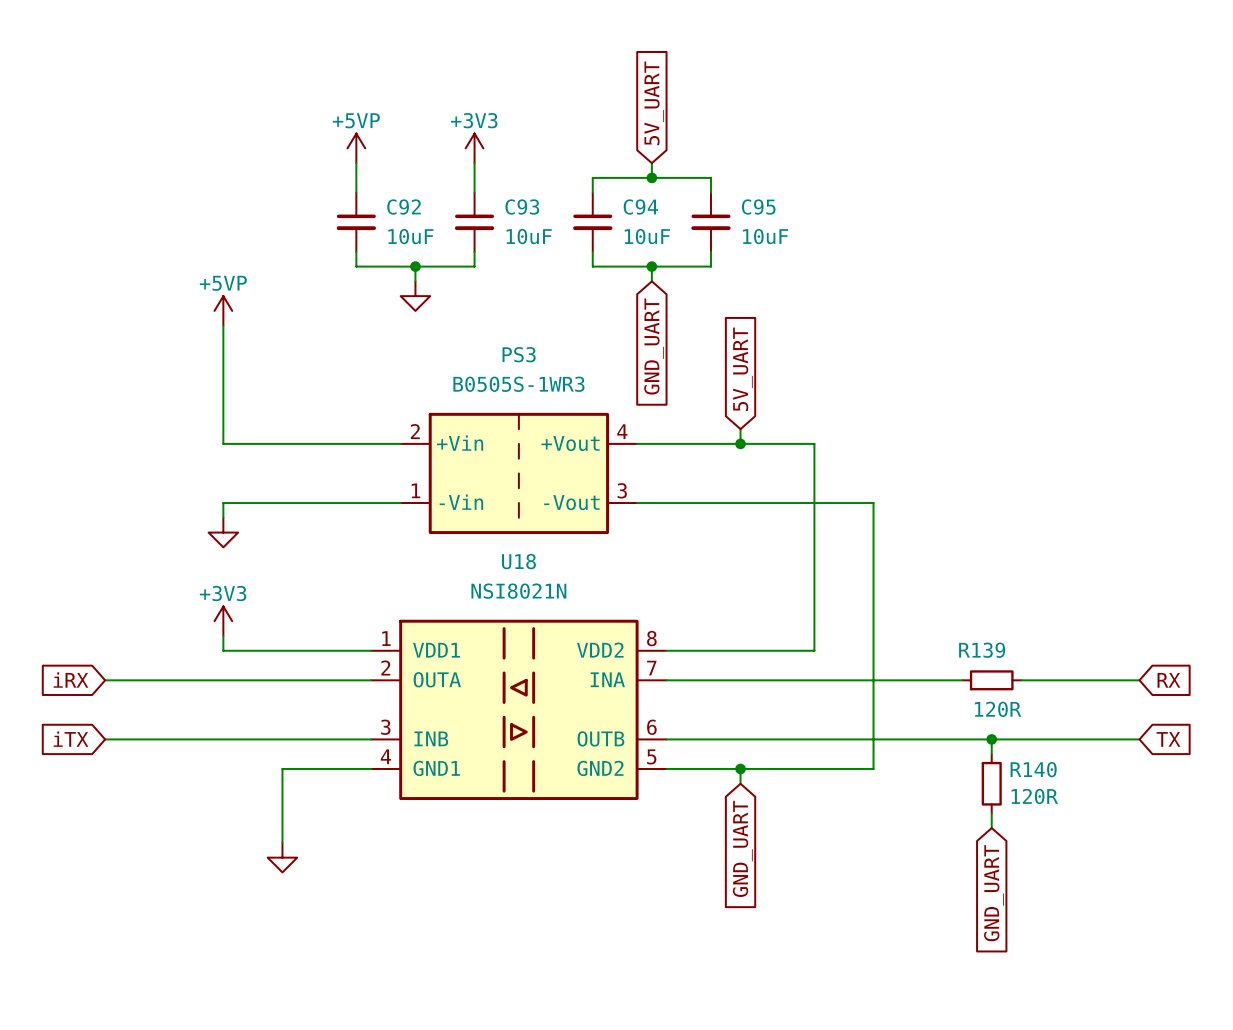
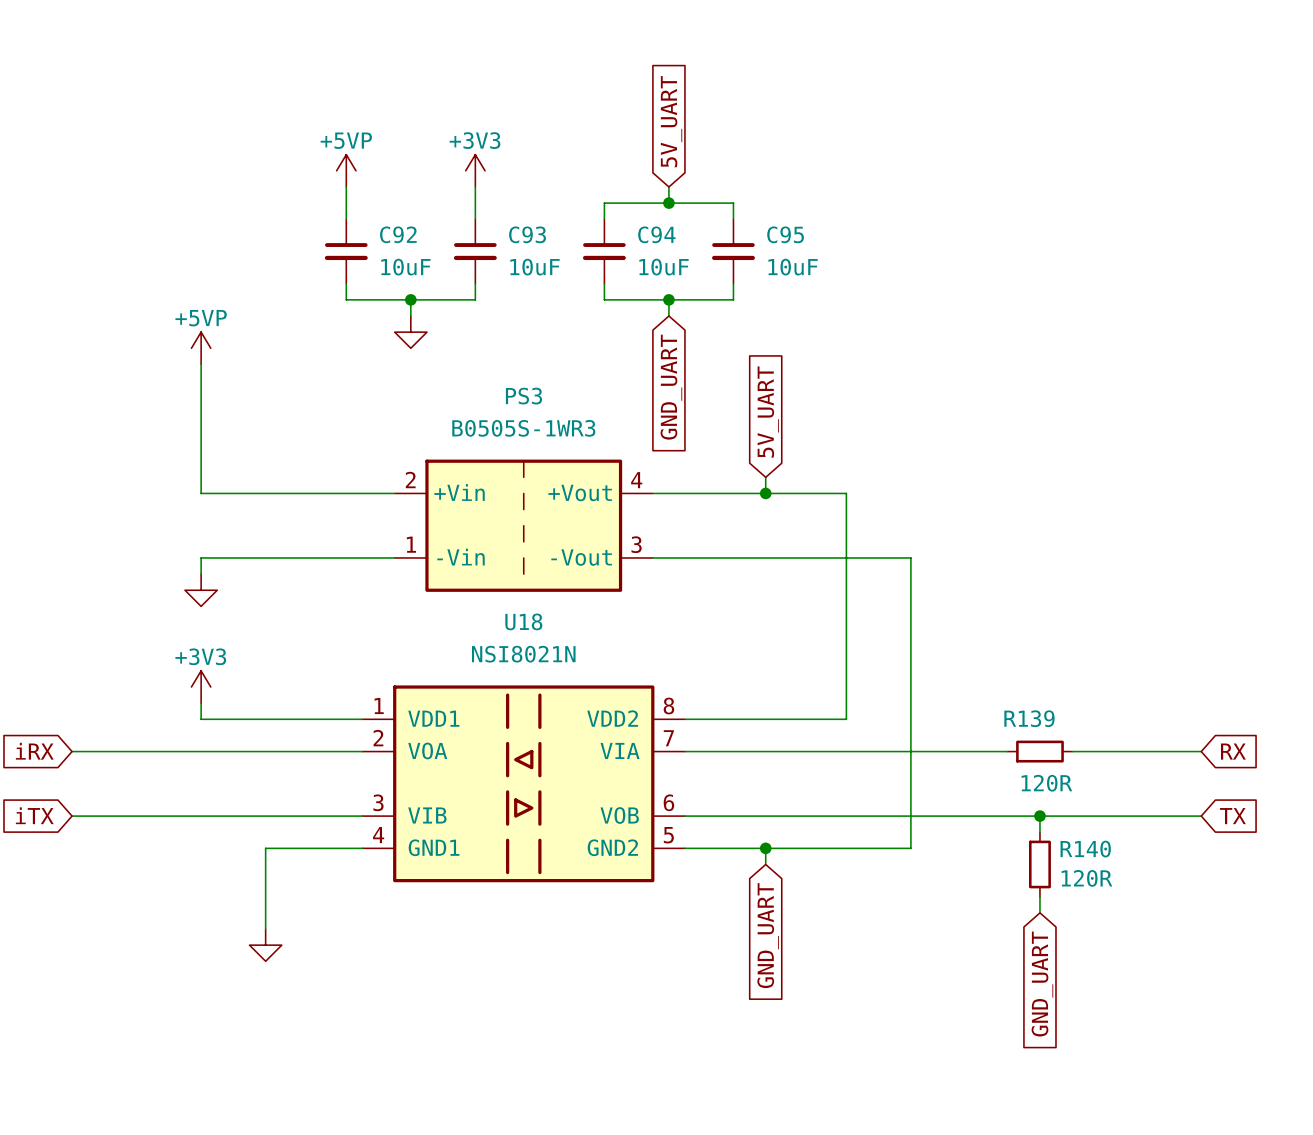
U18 pin name: OUTA (437, 679) -> VOA (427, 750)
U18 pin name: INA (607, 679) -> VIA (620, 750)
U18 pin name: INB (431, 738) -> VIB (427, 815)
U18 pin name: OUTB (600, 738) -> VOB (619, 815)

